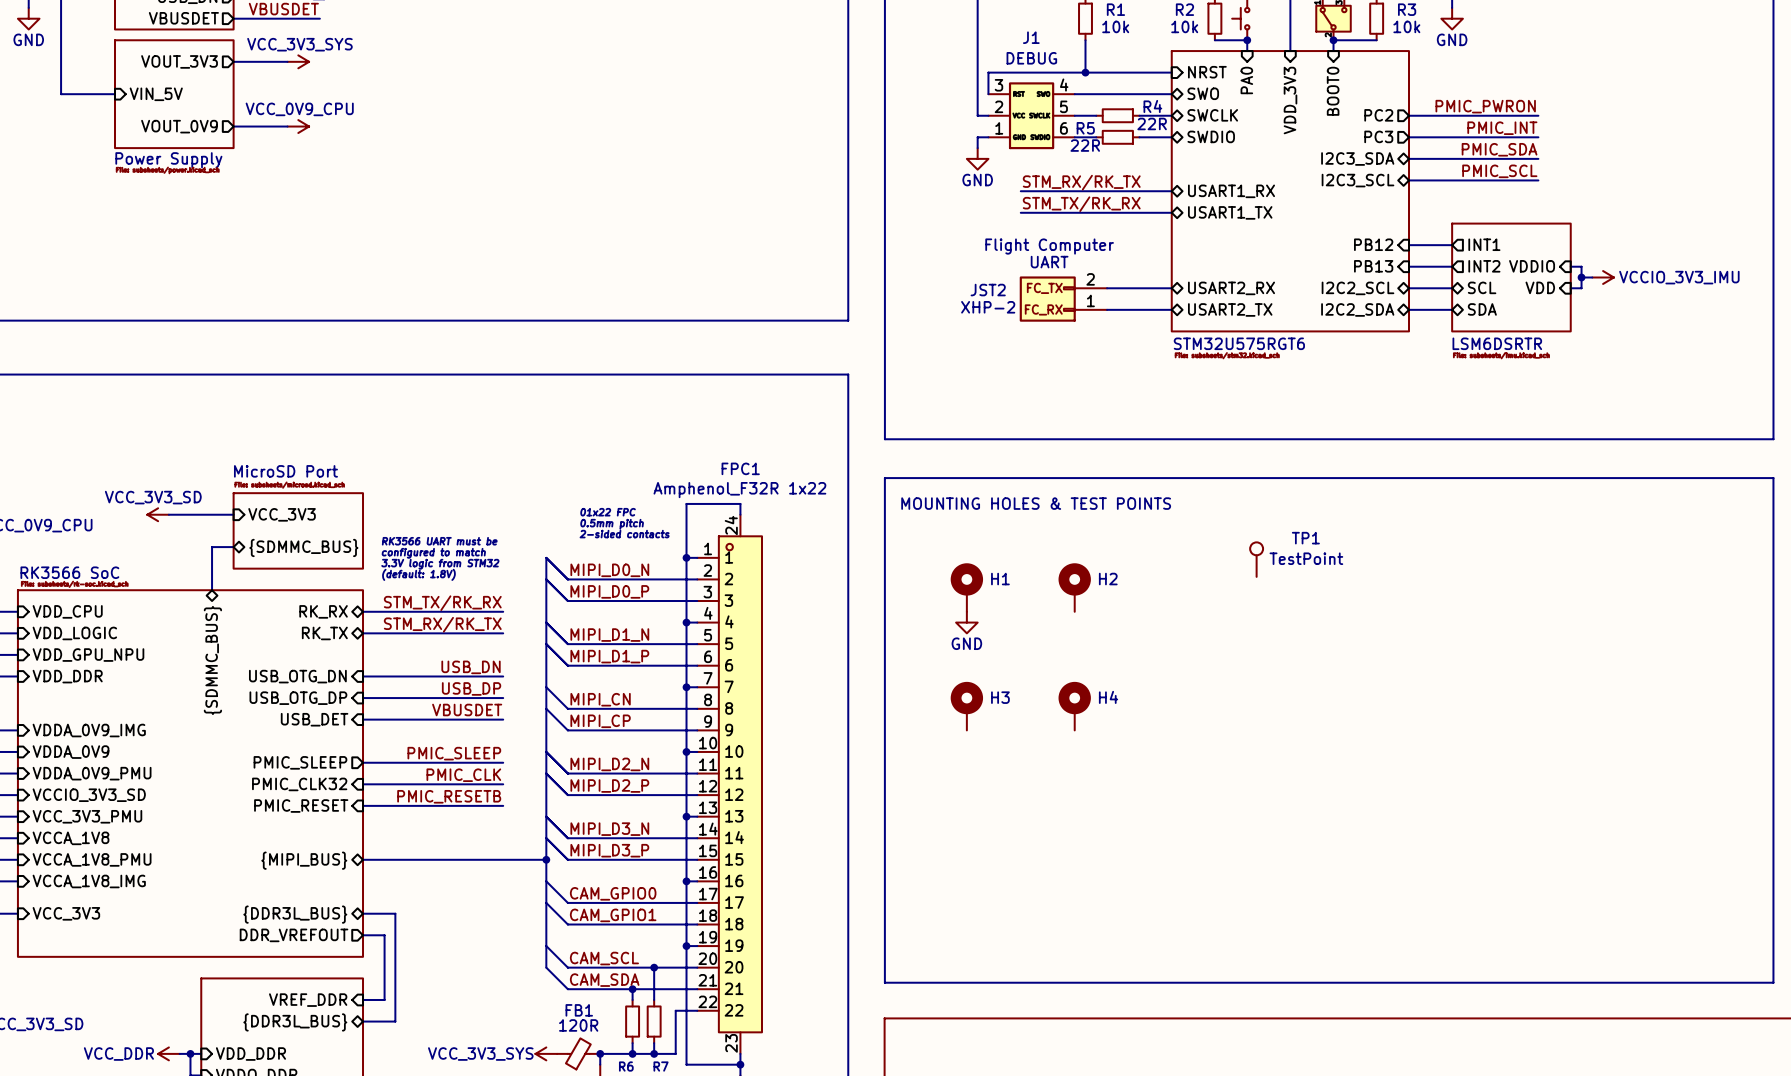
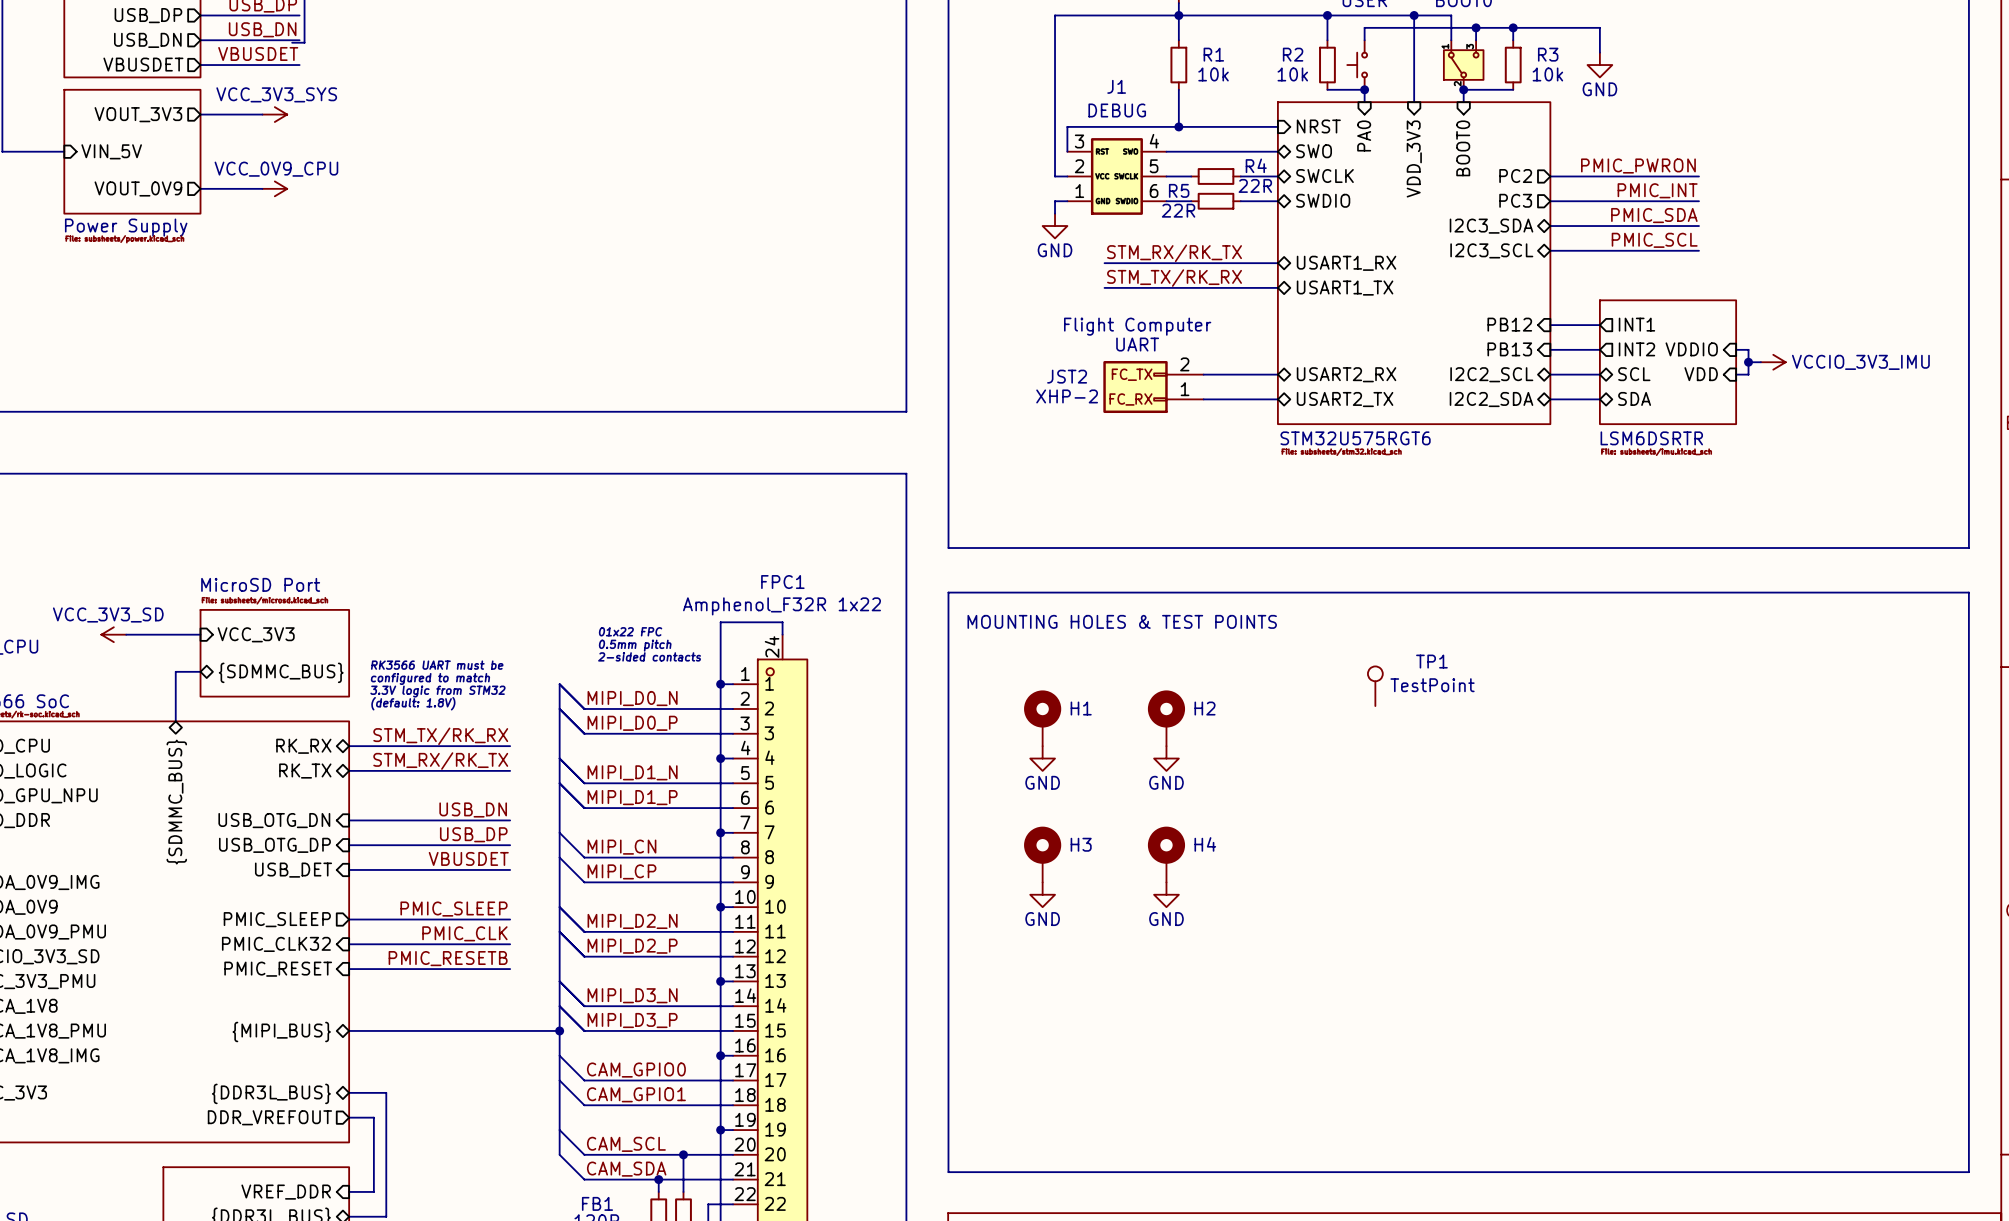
power symbol: none -> GND (1166, 758)
power symbol: none -> GND (1042, 894)
power symbol: none -> GND (1166, 894)

